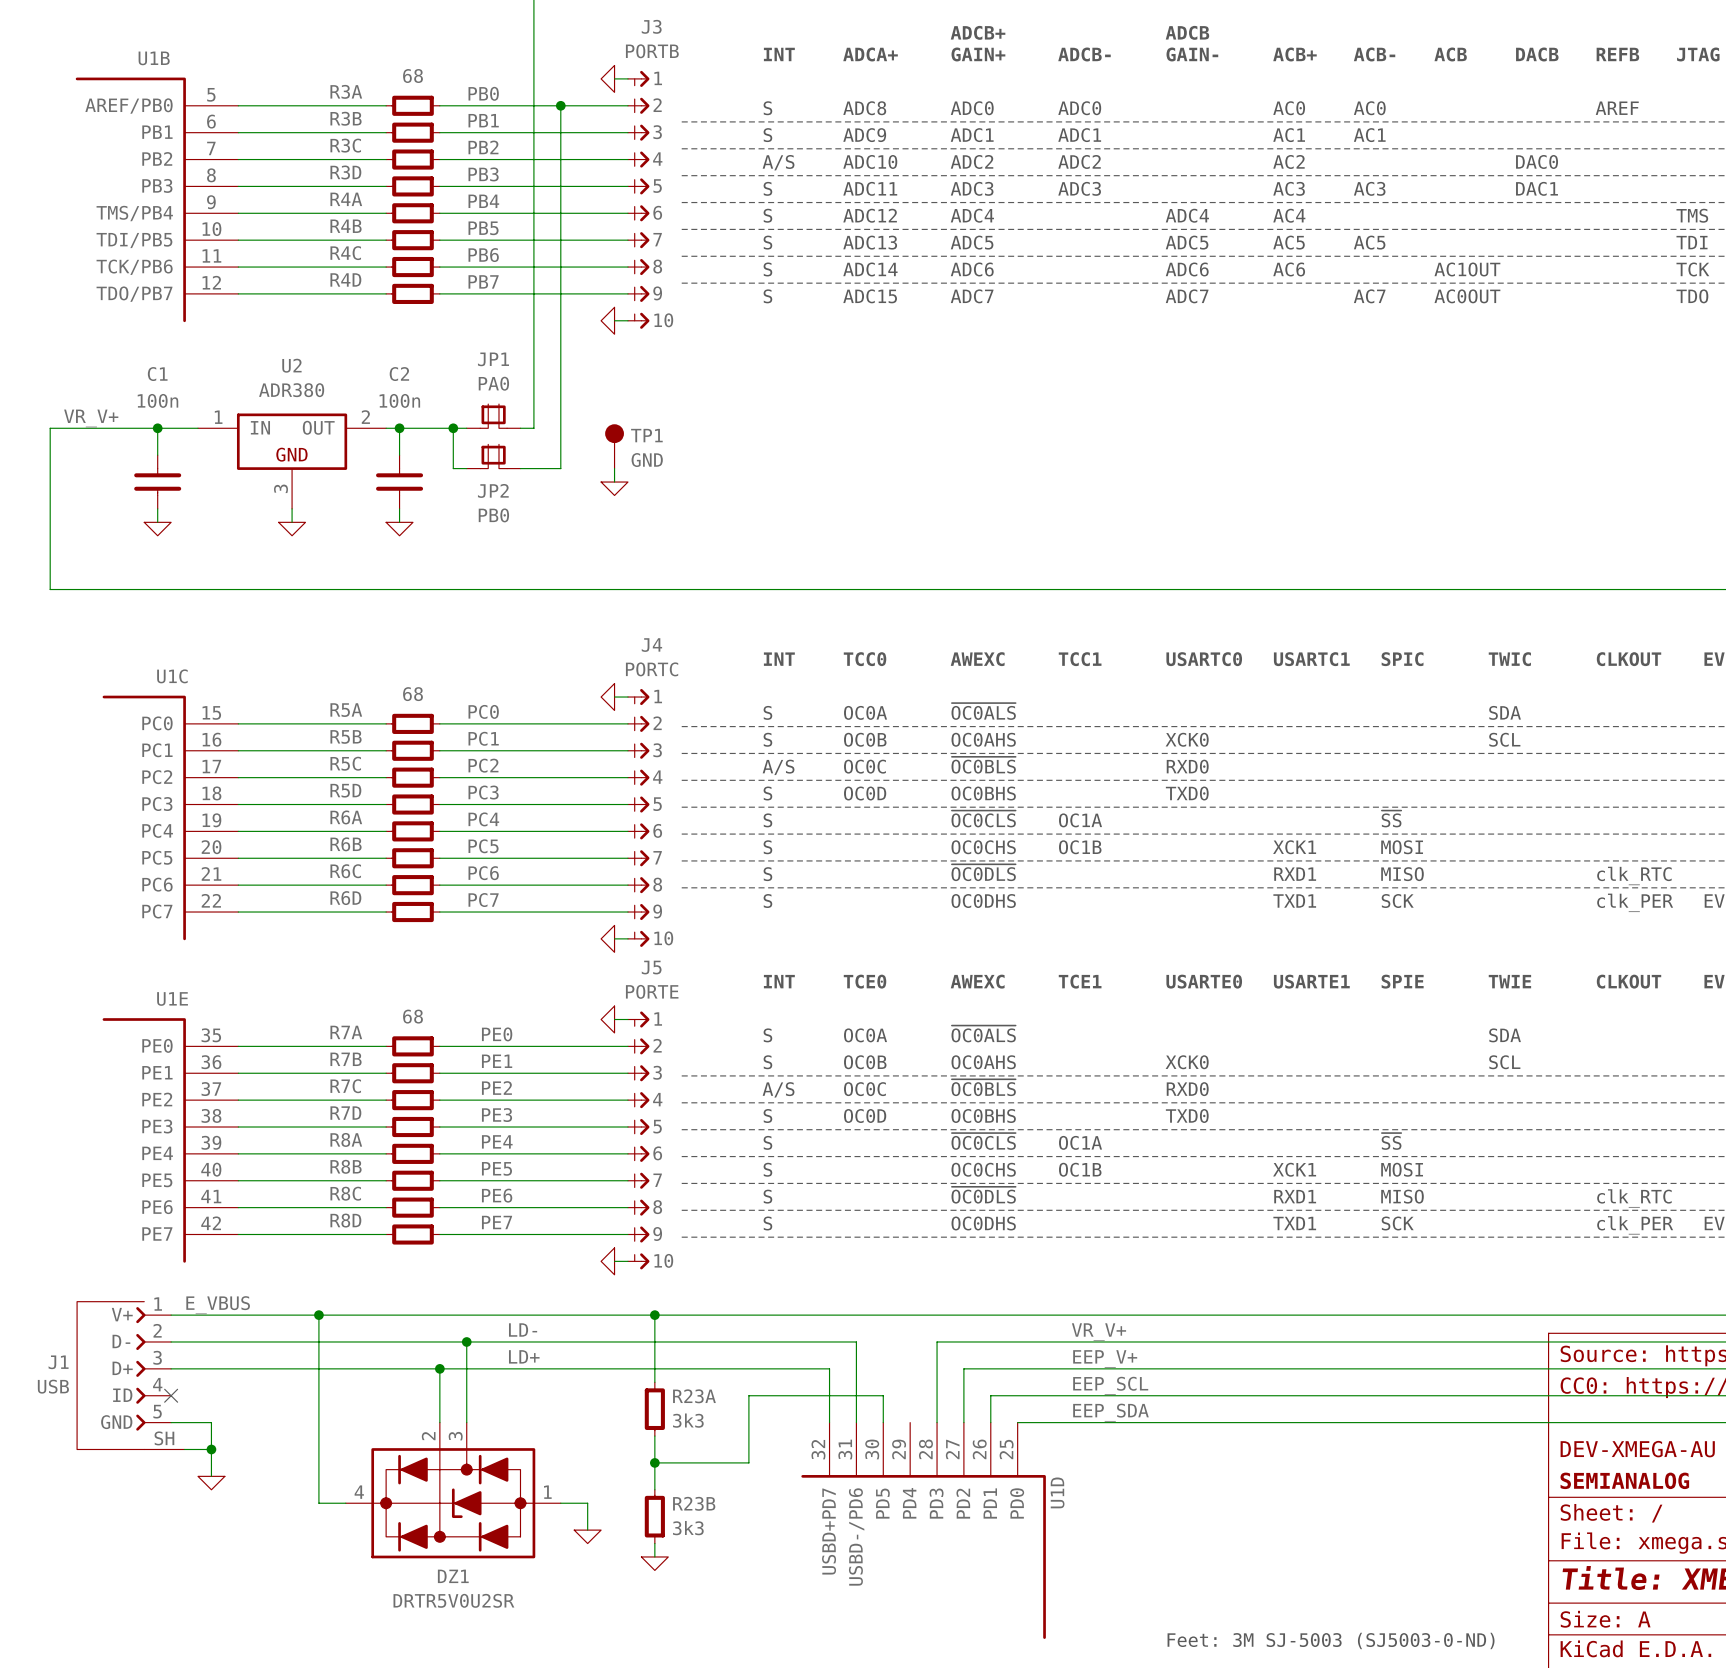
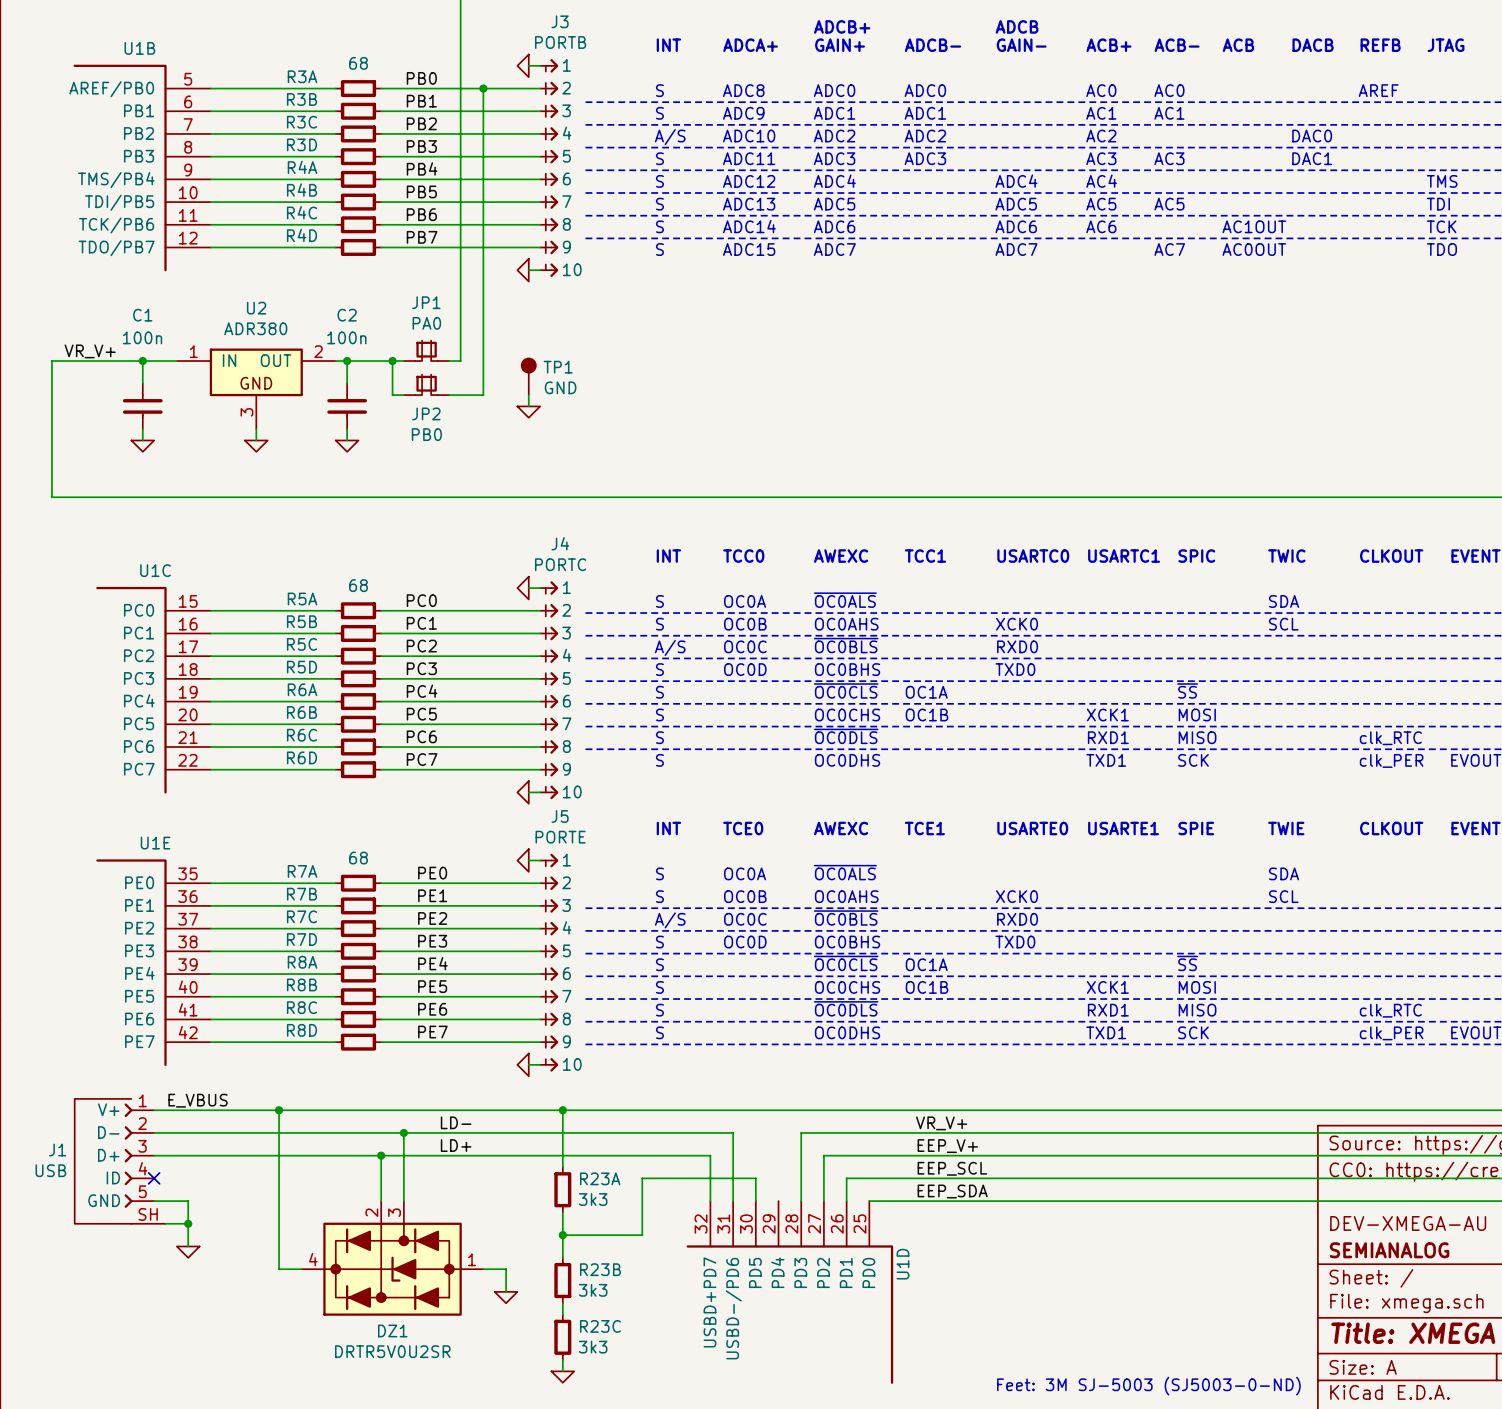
power symbol position: (654, 1563) -> (562, 1377)
R23C: none -> 3k3 (562, 1337)
wire: none -> (562, 1360) (562, 1371)

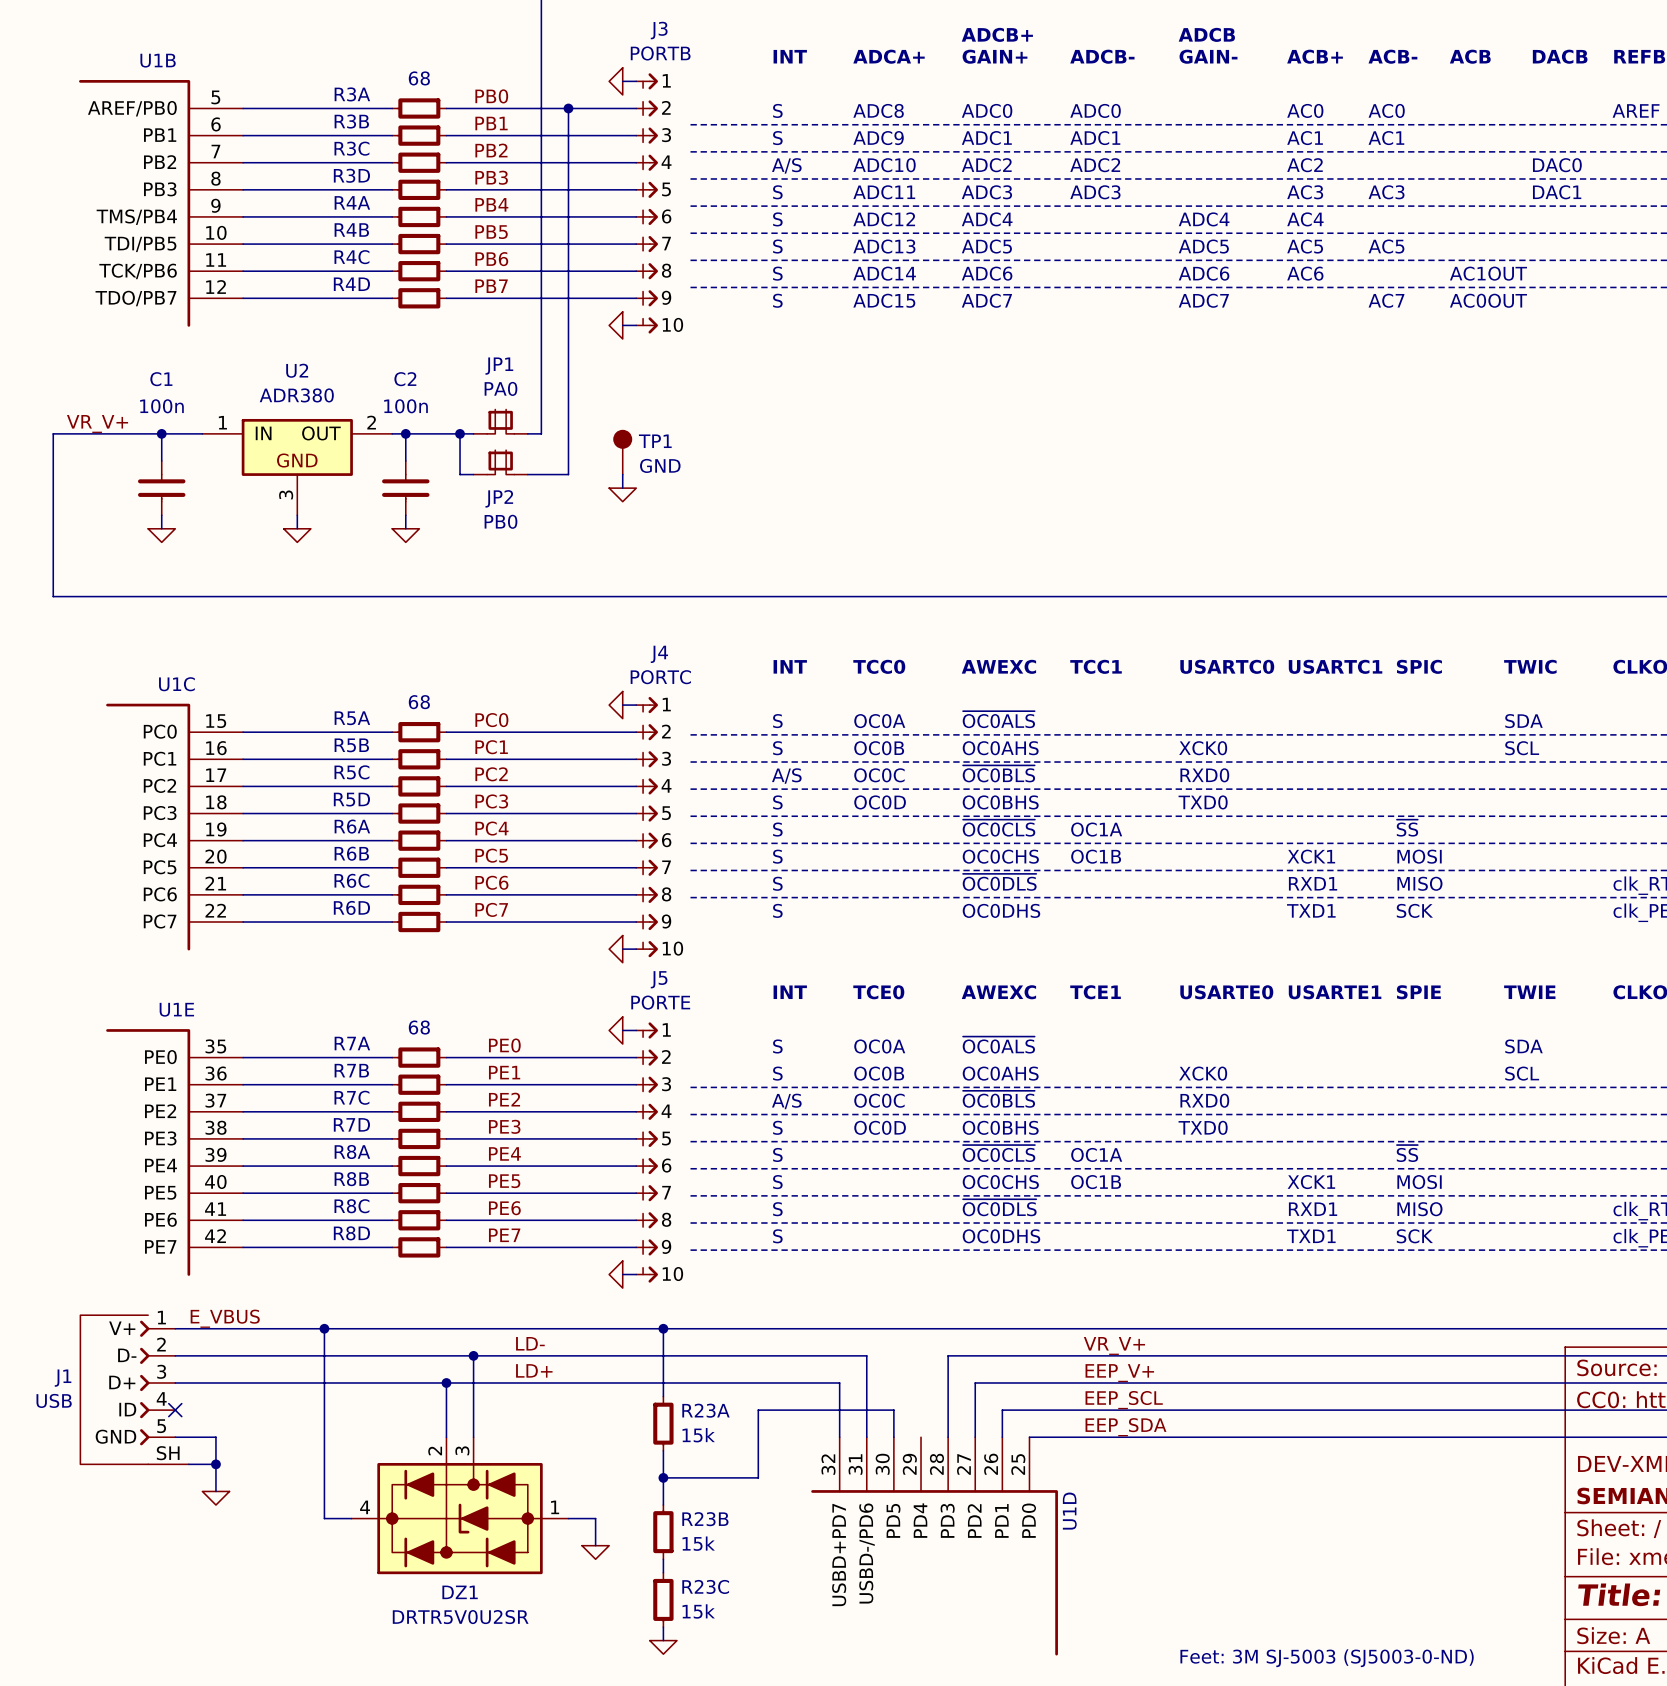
R23A value: 3k3 (593, 1199) -> 15k (698, 1435)
R23B value: 3k3 (593, 1290) -> 15k (698, 1543)
R23C value: 3k3 (593, 1347) -> 15k (698, 1611)

